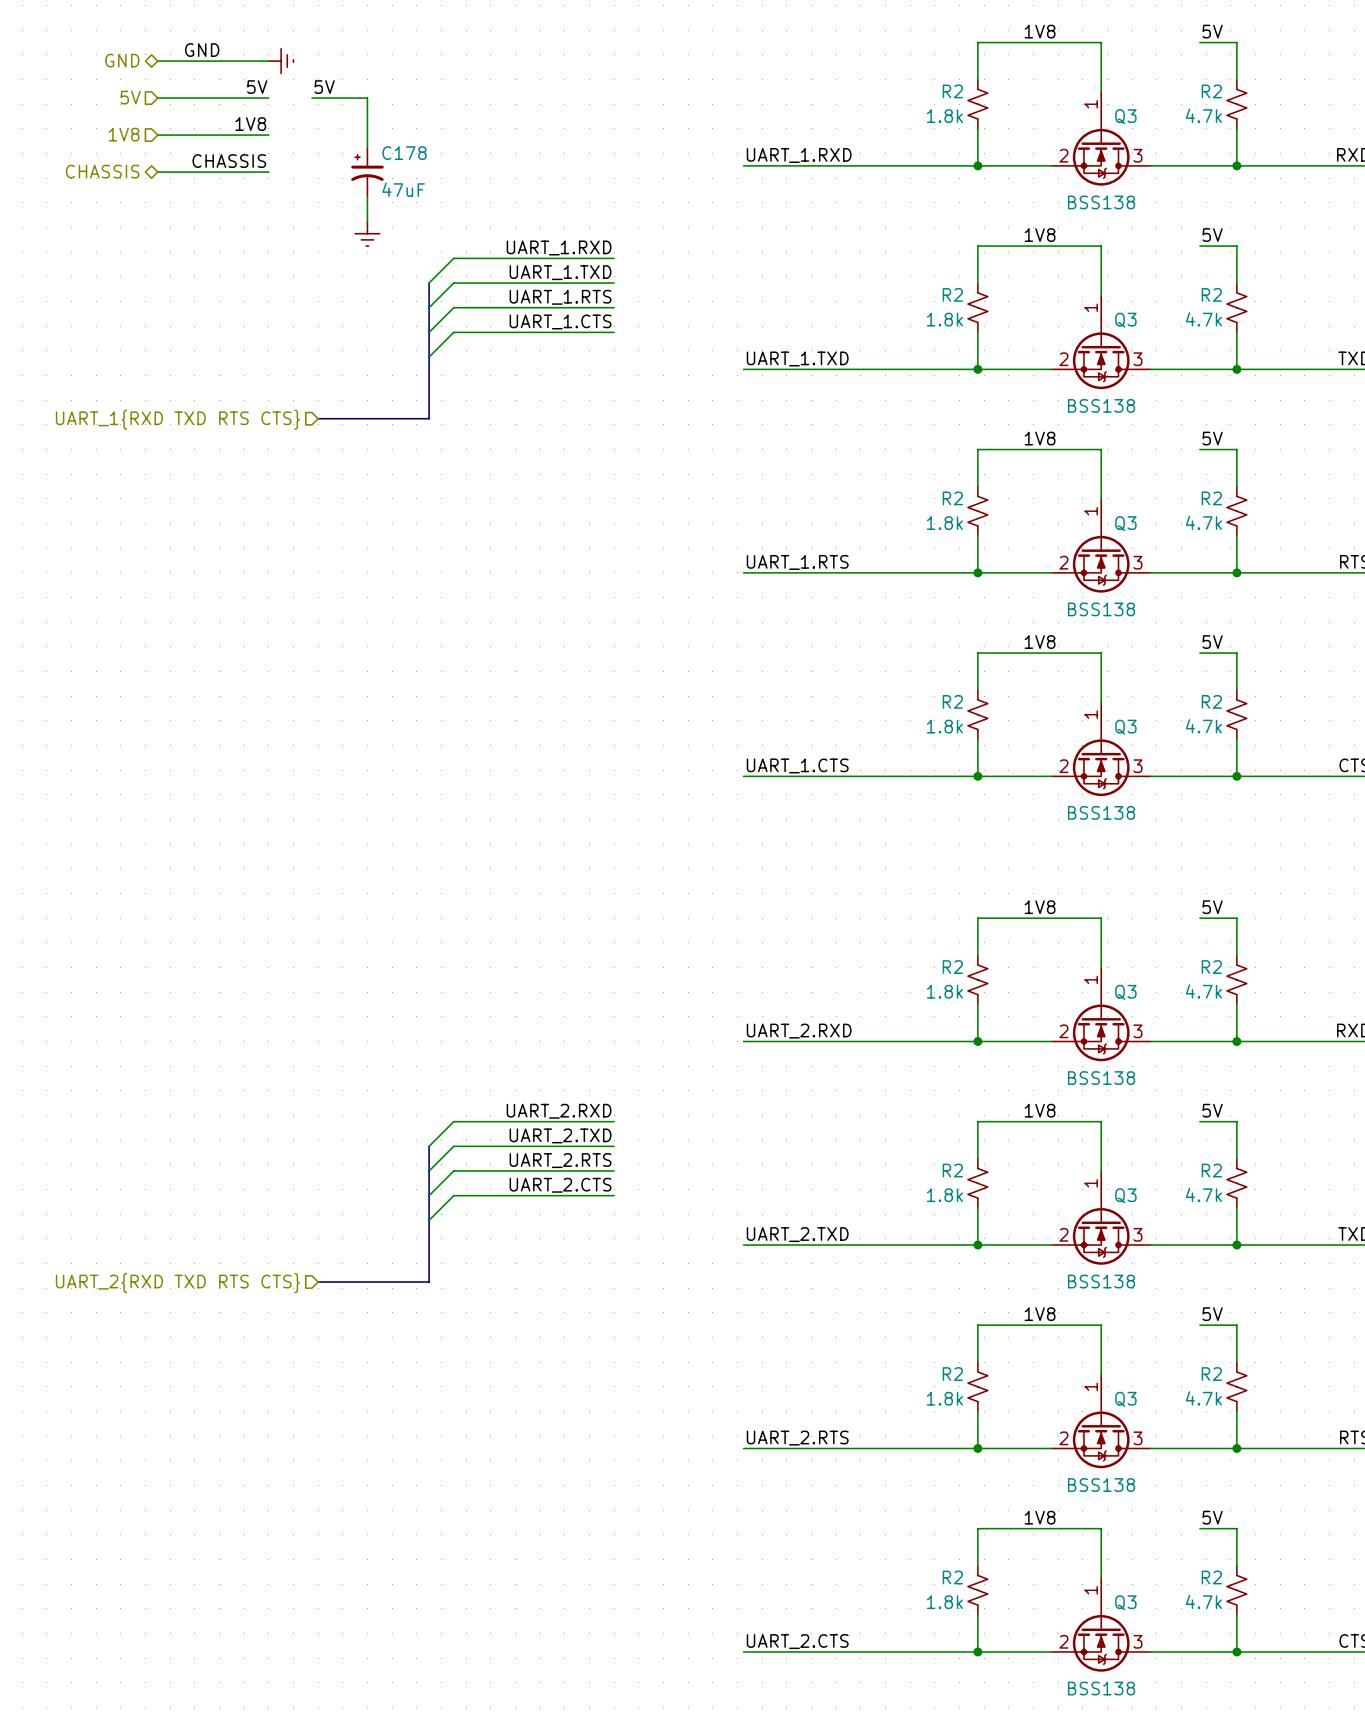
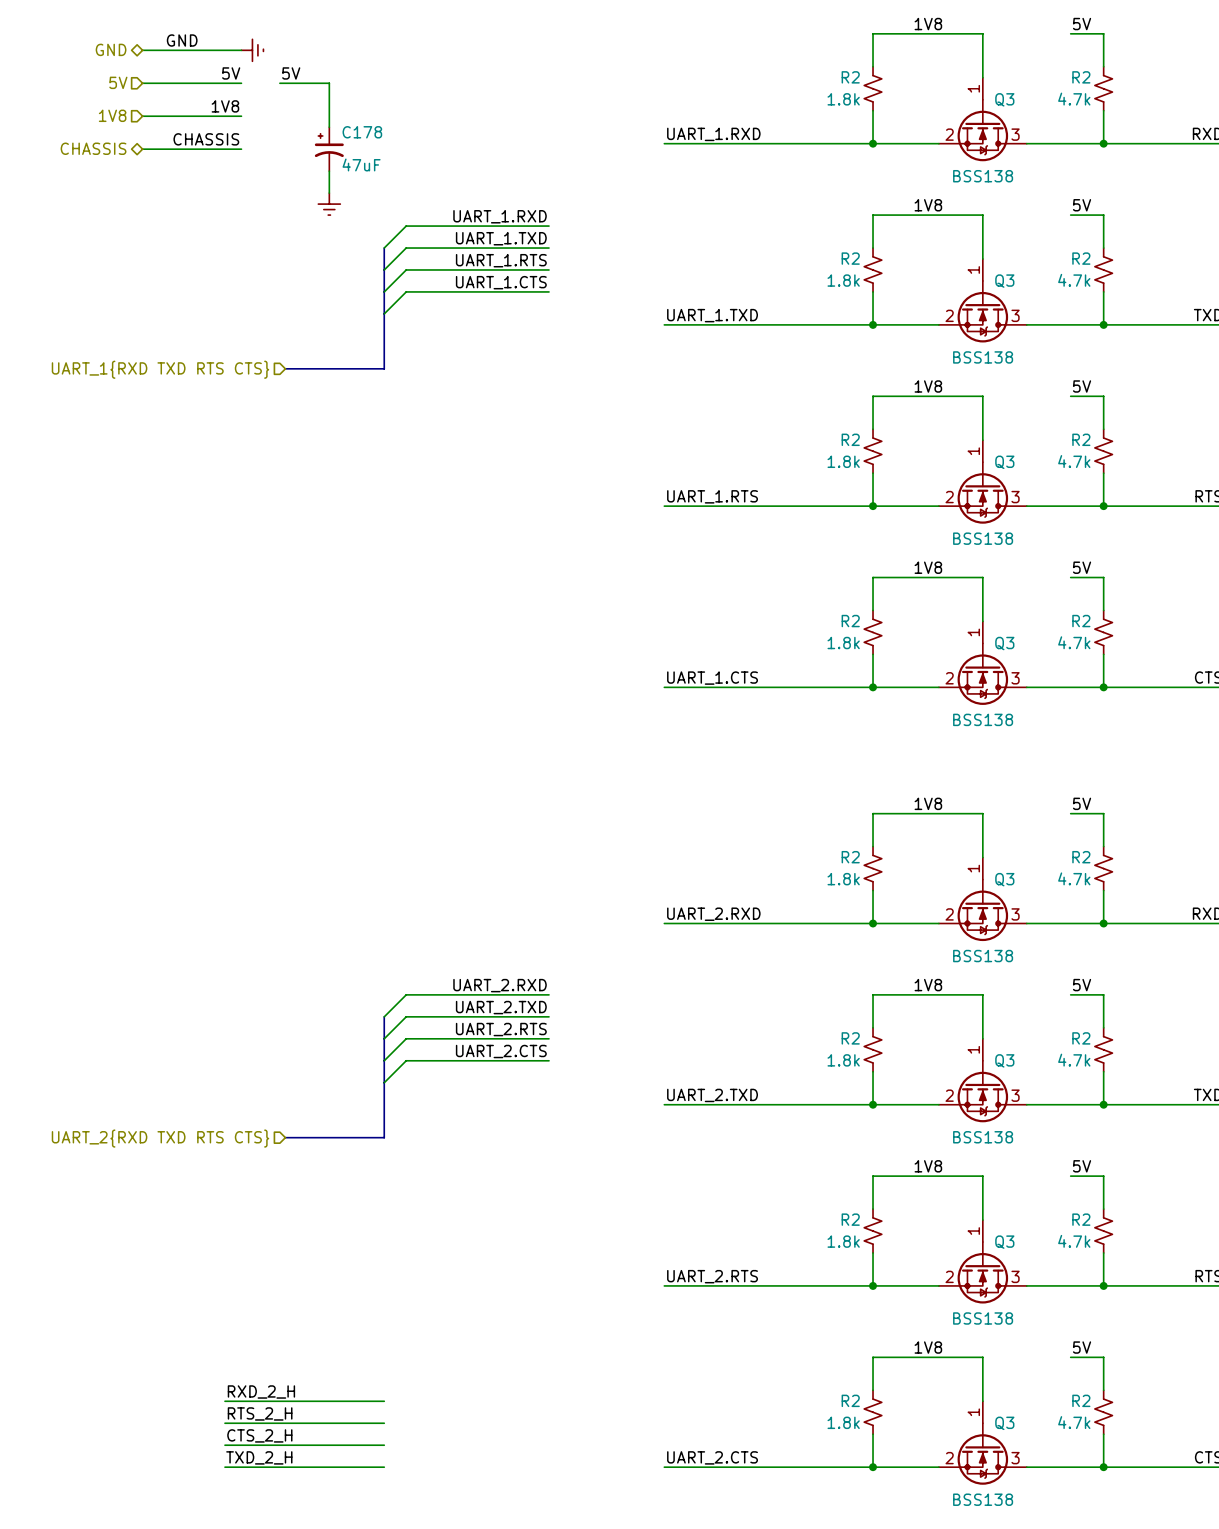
label: none -> RXD_2_H (261, 1392)
wire: none -> (224, 1401) (384, 1401)
label: none -> RTS_2_H (260, 1413)
wire: none -> (224, 1423) (384, 1423)
label: none -> CTS_2_H (259, 1435)
wire: none -> (224, 1445) (384, 1445)
label: none -> TXD_2_H (259, 1457)
wire: none -> (224, 1467) (384, 1467)

